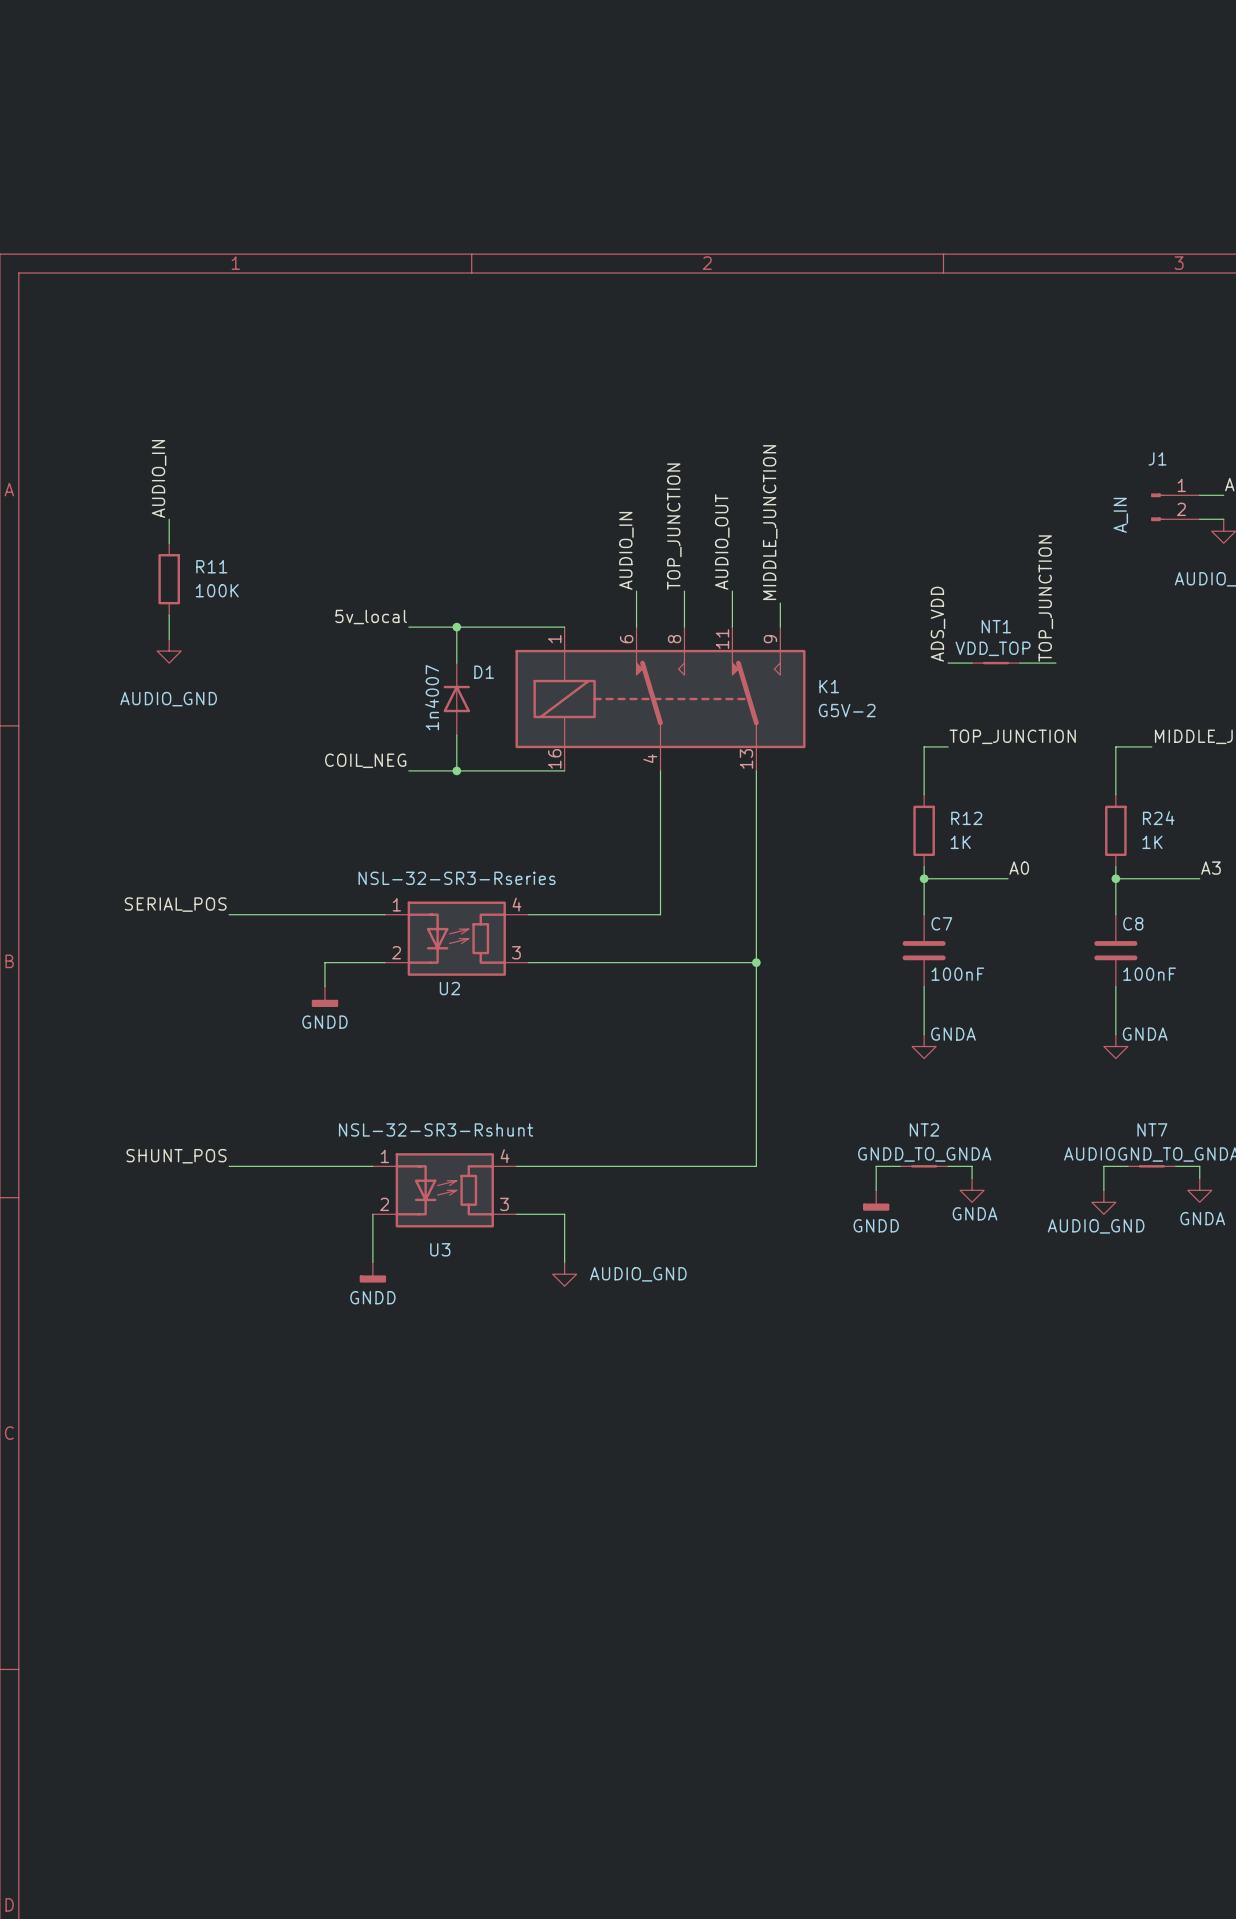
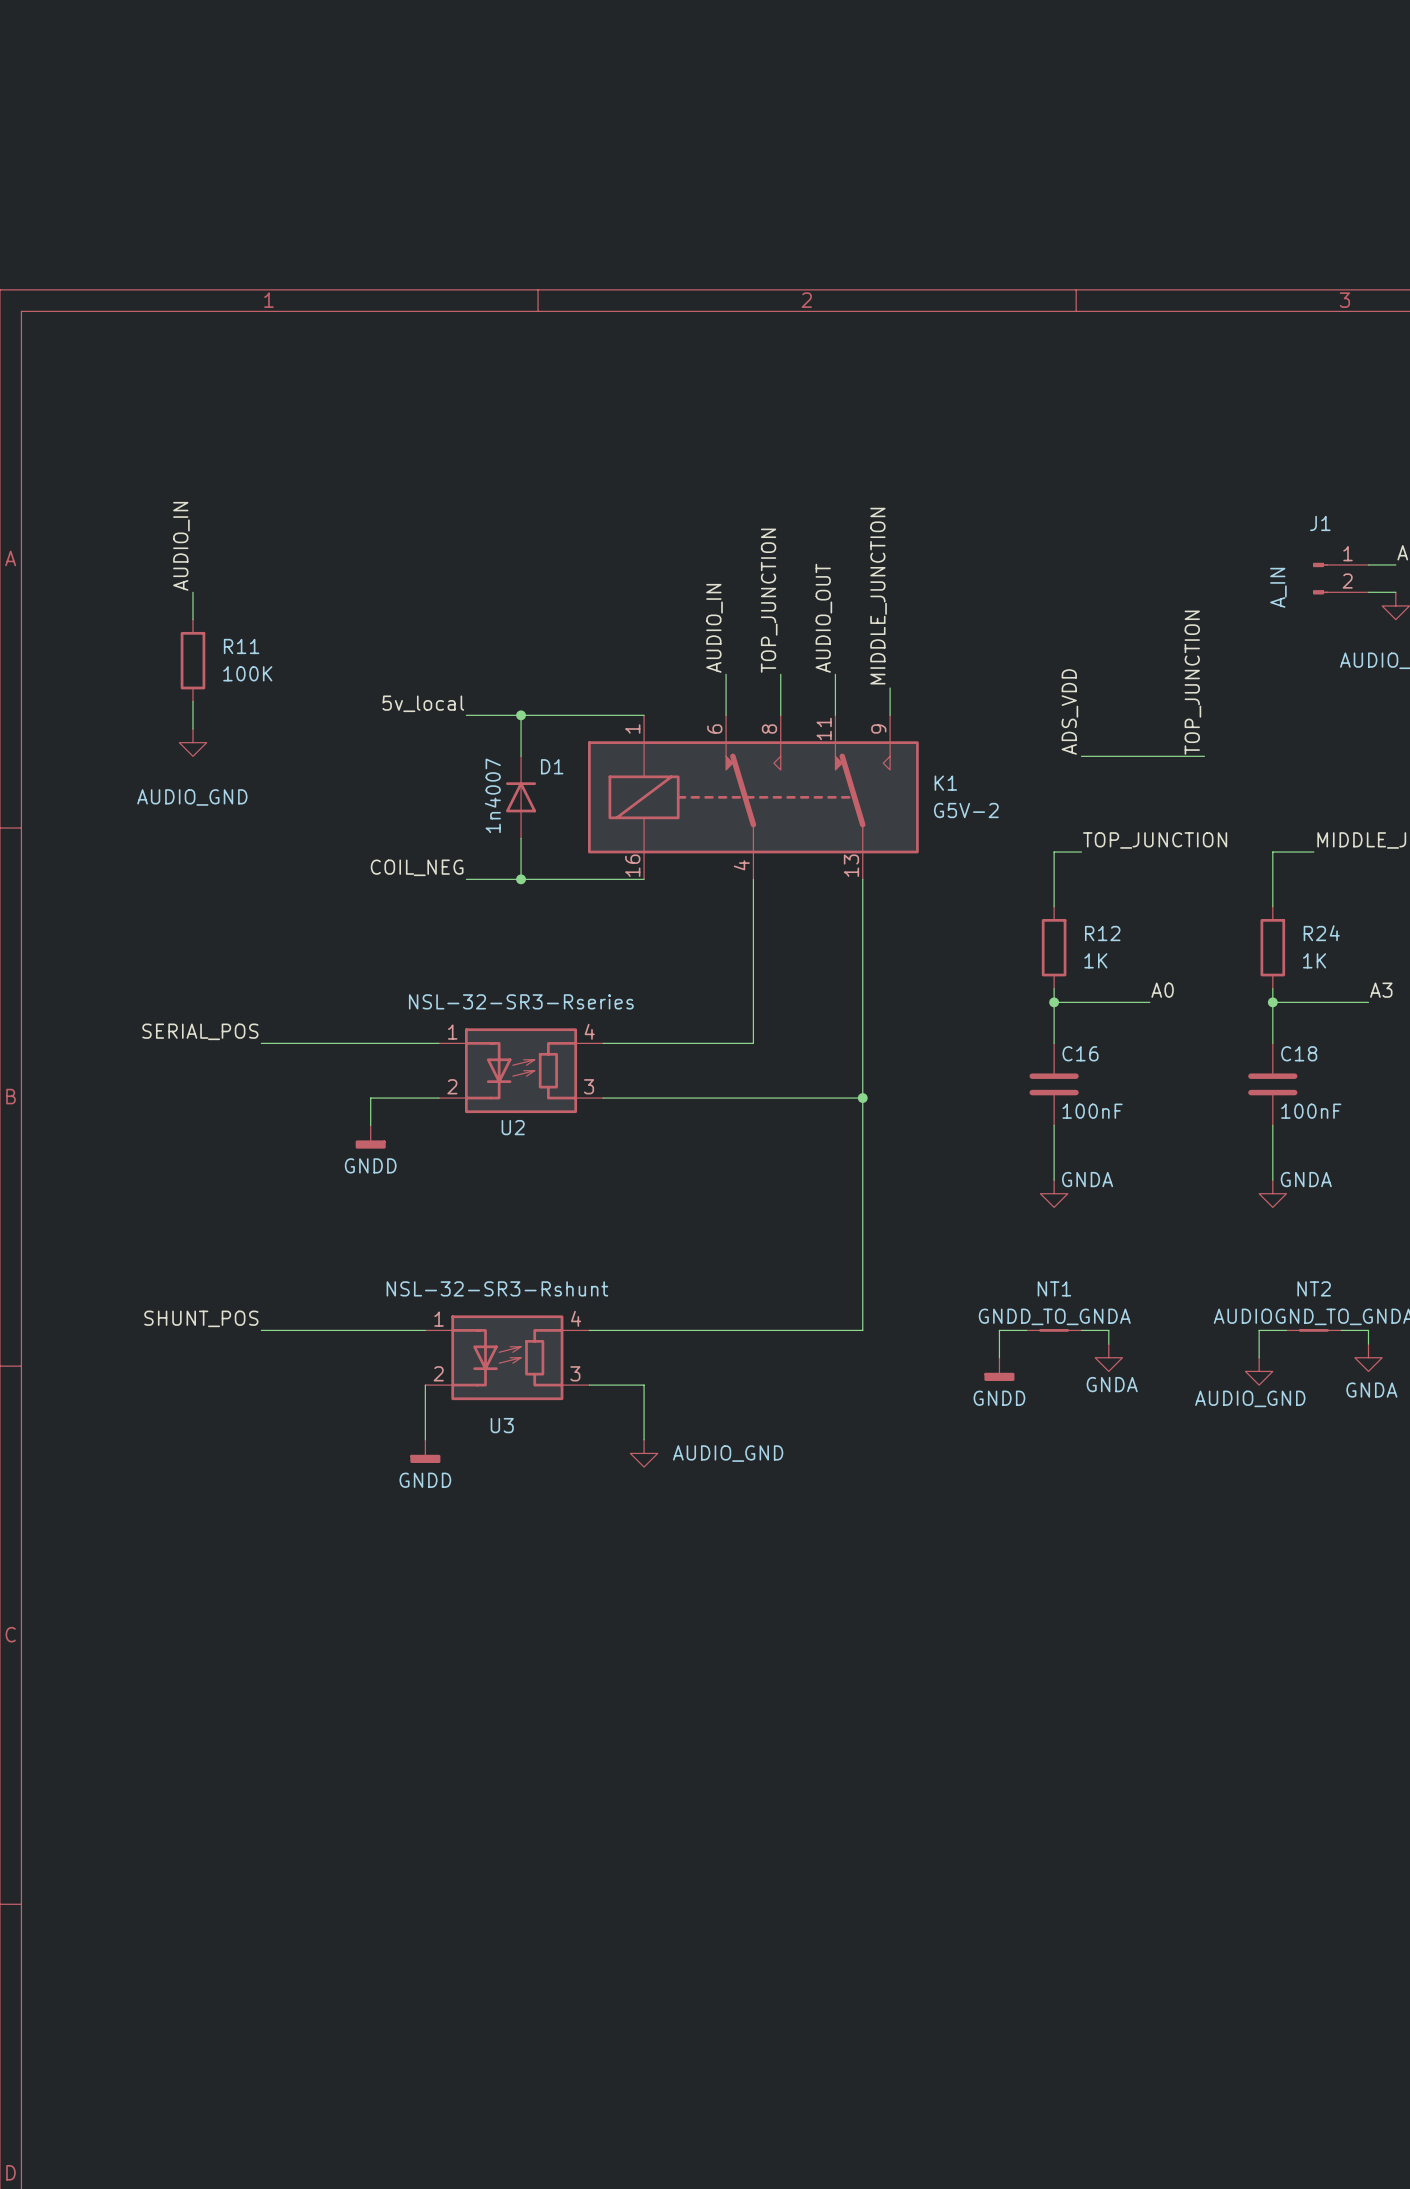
NT1: VDD_TOP (996, 663) -> none
C7 name: C7 (941, 923) -> C16 (1080, 1053)
C8 name: C8 (1133, 923) -> C18 (1299, 1053)
NT2 name: NT2 (924, 1129) -> NT1 (1054, 1288)
NT7 name: NT7 (1152, 1129) -> NT2 (1314, 1288)

